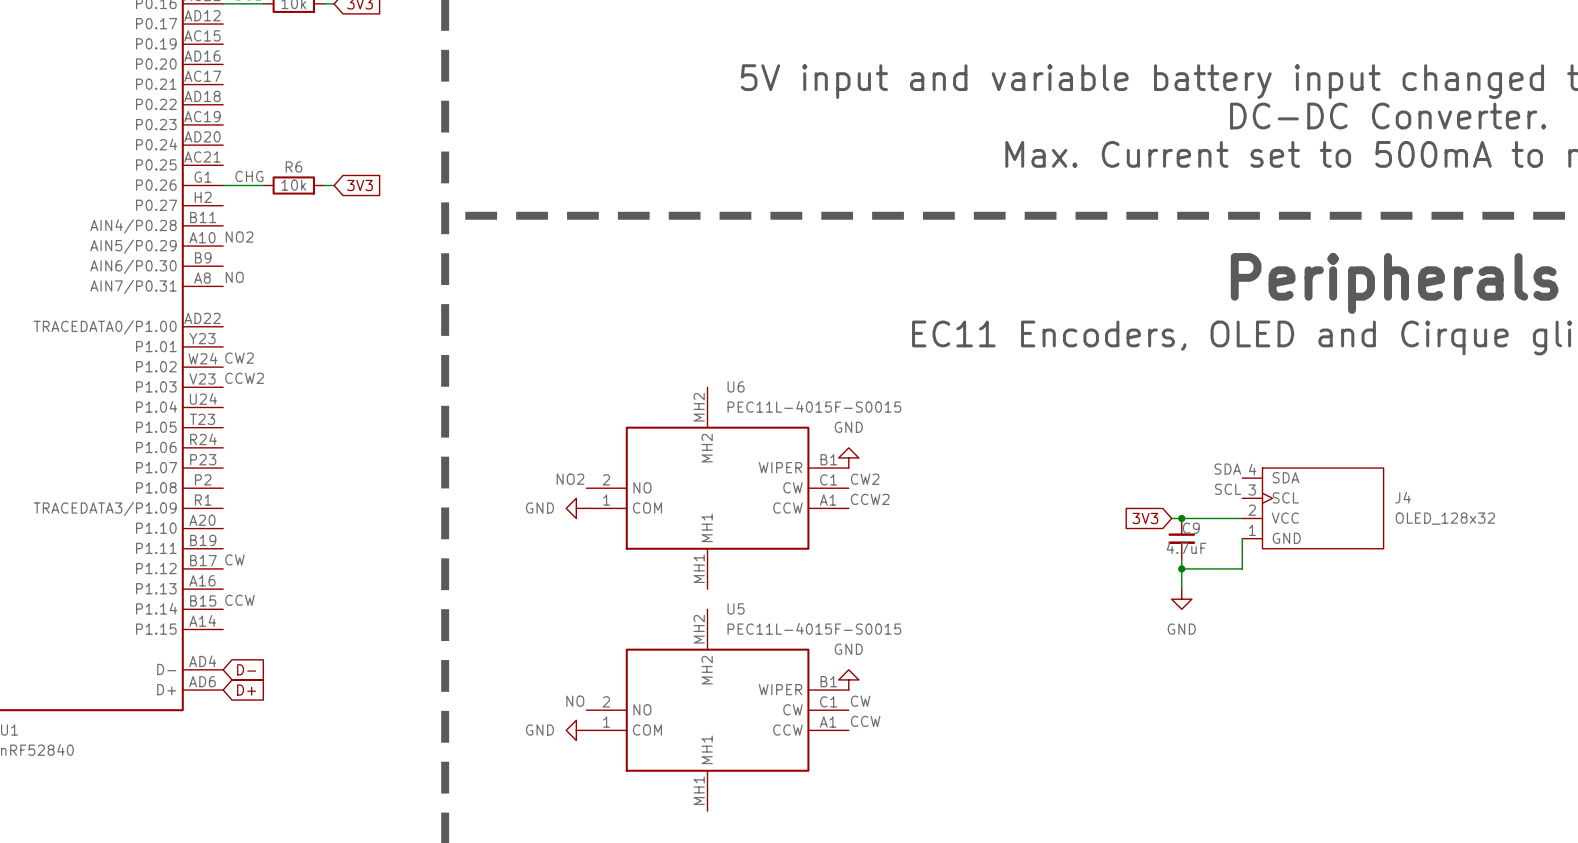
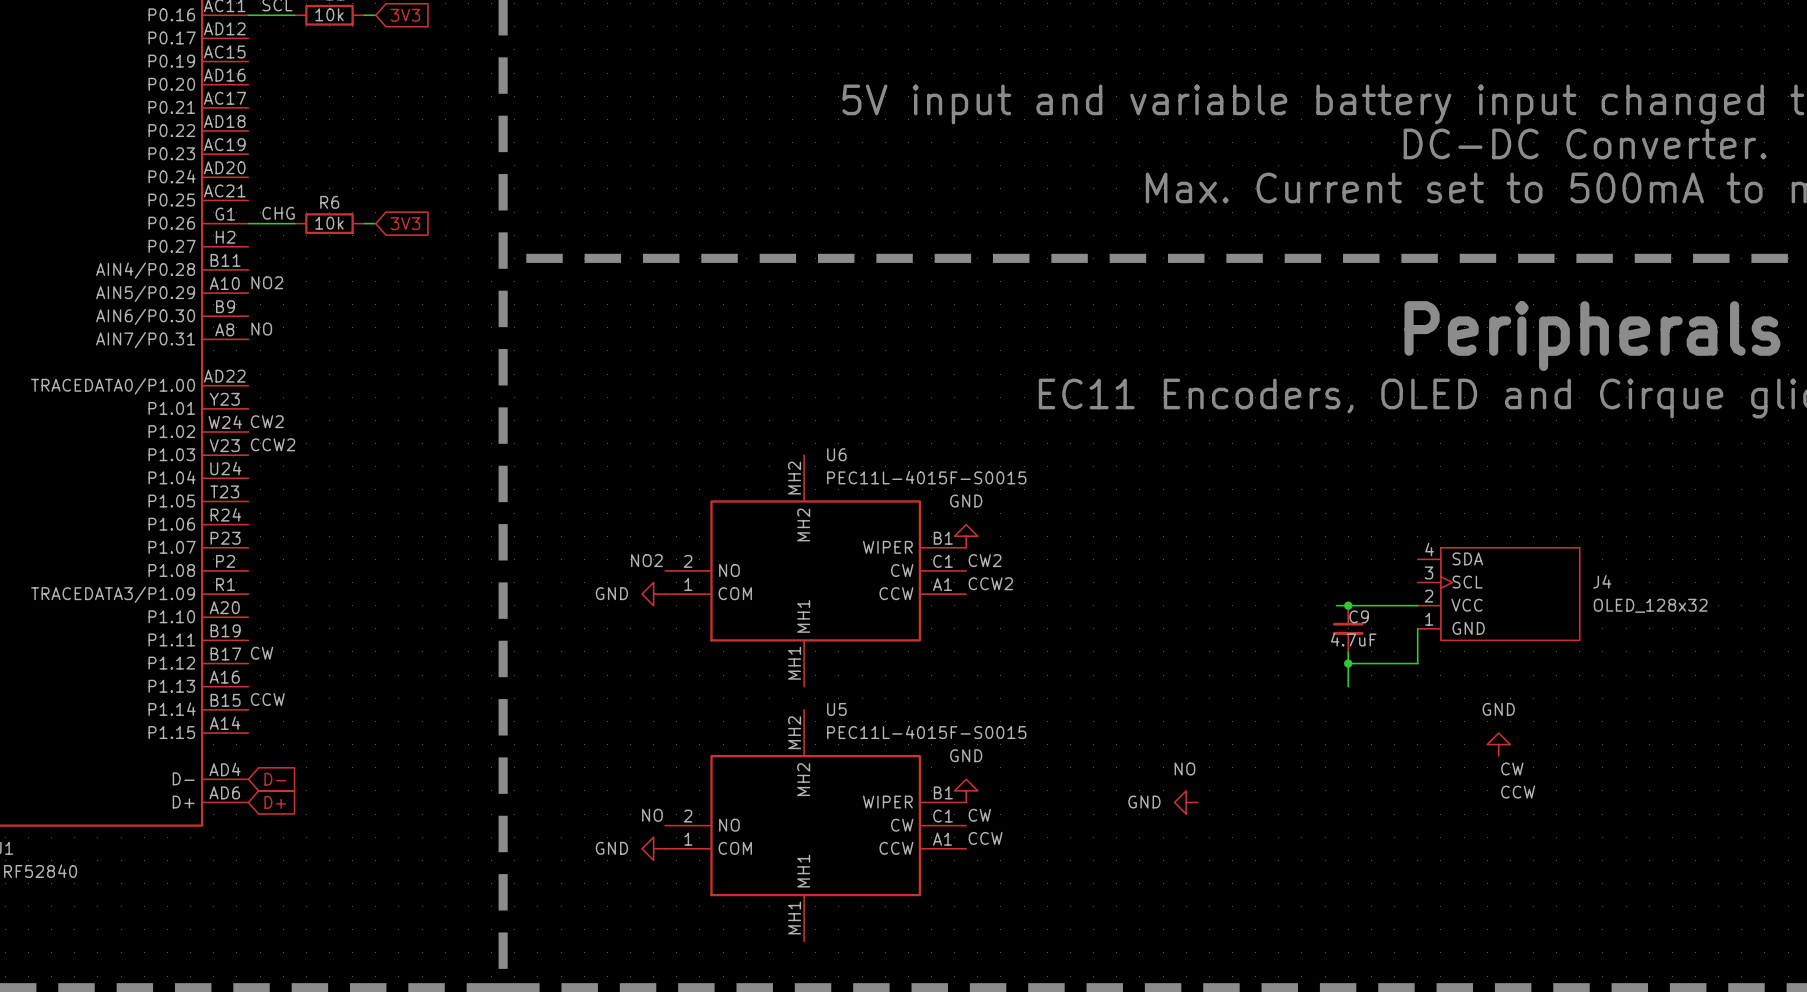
label: SDA (1227, 469) -> none
label: SCL (1228, 489) -> none
global label: 3V3 (1145, 518) -> none
power symbol: GND (1181, 599) -> none
power symbol: none -> GND (1498, 744)
label: none -> NO (1184, 768)
label: none -> CW (1512, 768)
label: none -> CCW (1518, 792)
power symbol: none -> GND (1186, 802)

